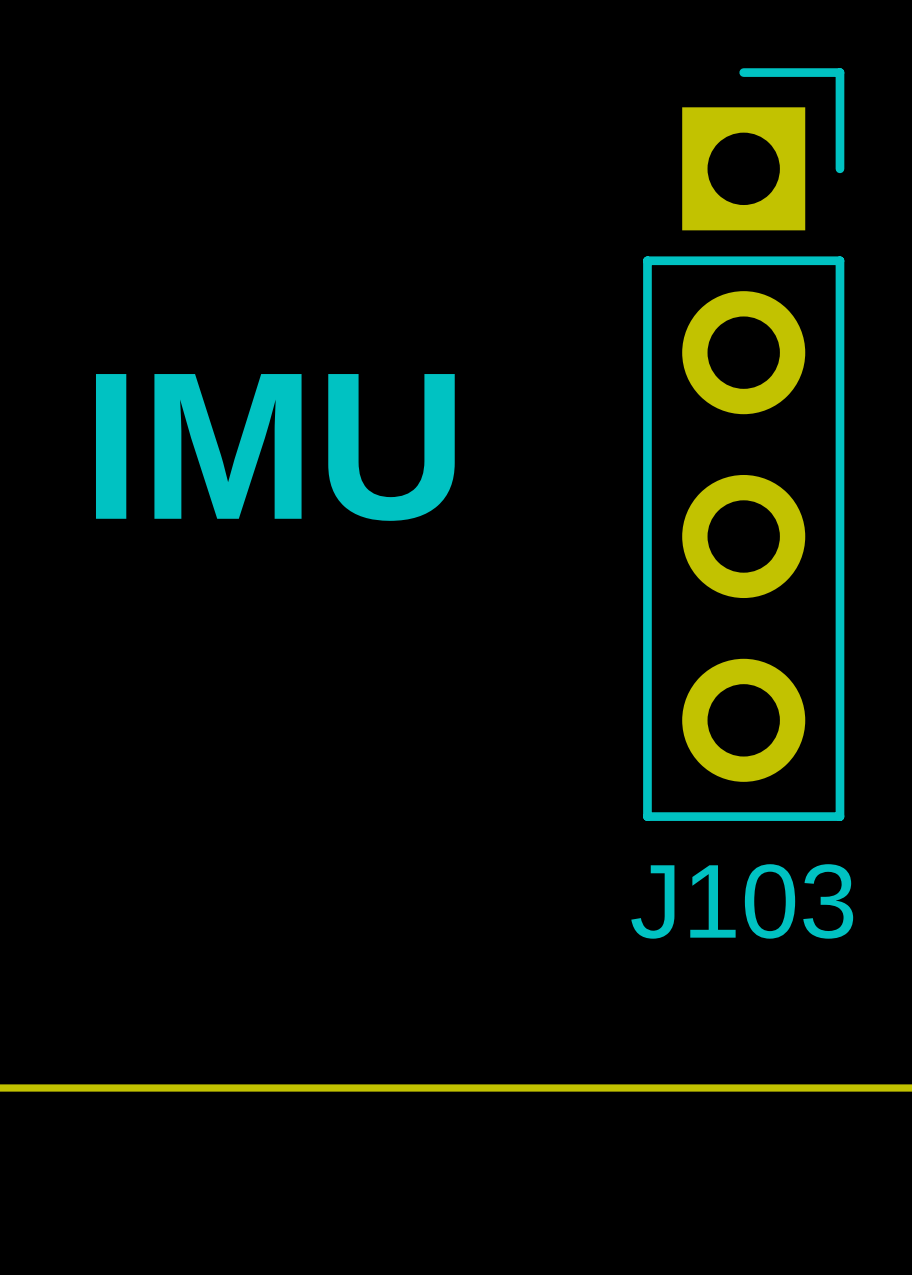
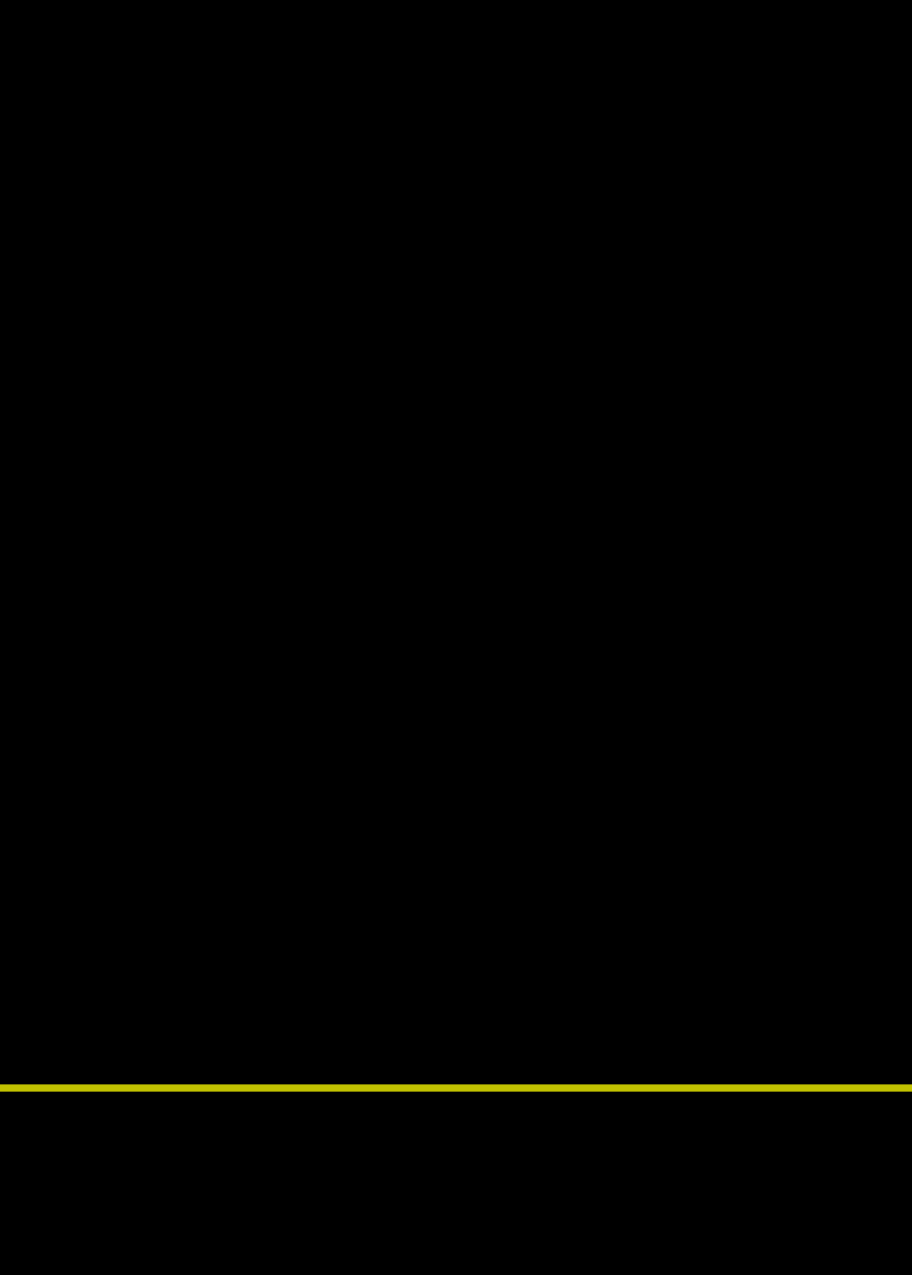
J103: (743, 444) -> none
text: IMU (275, 447) -> none

